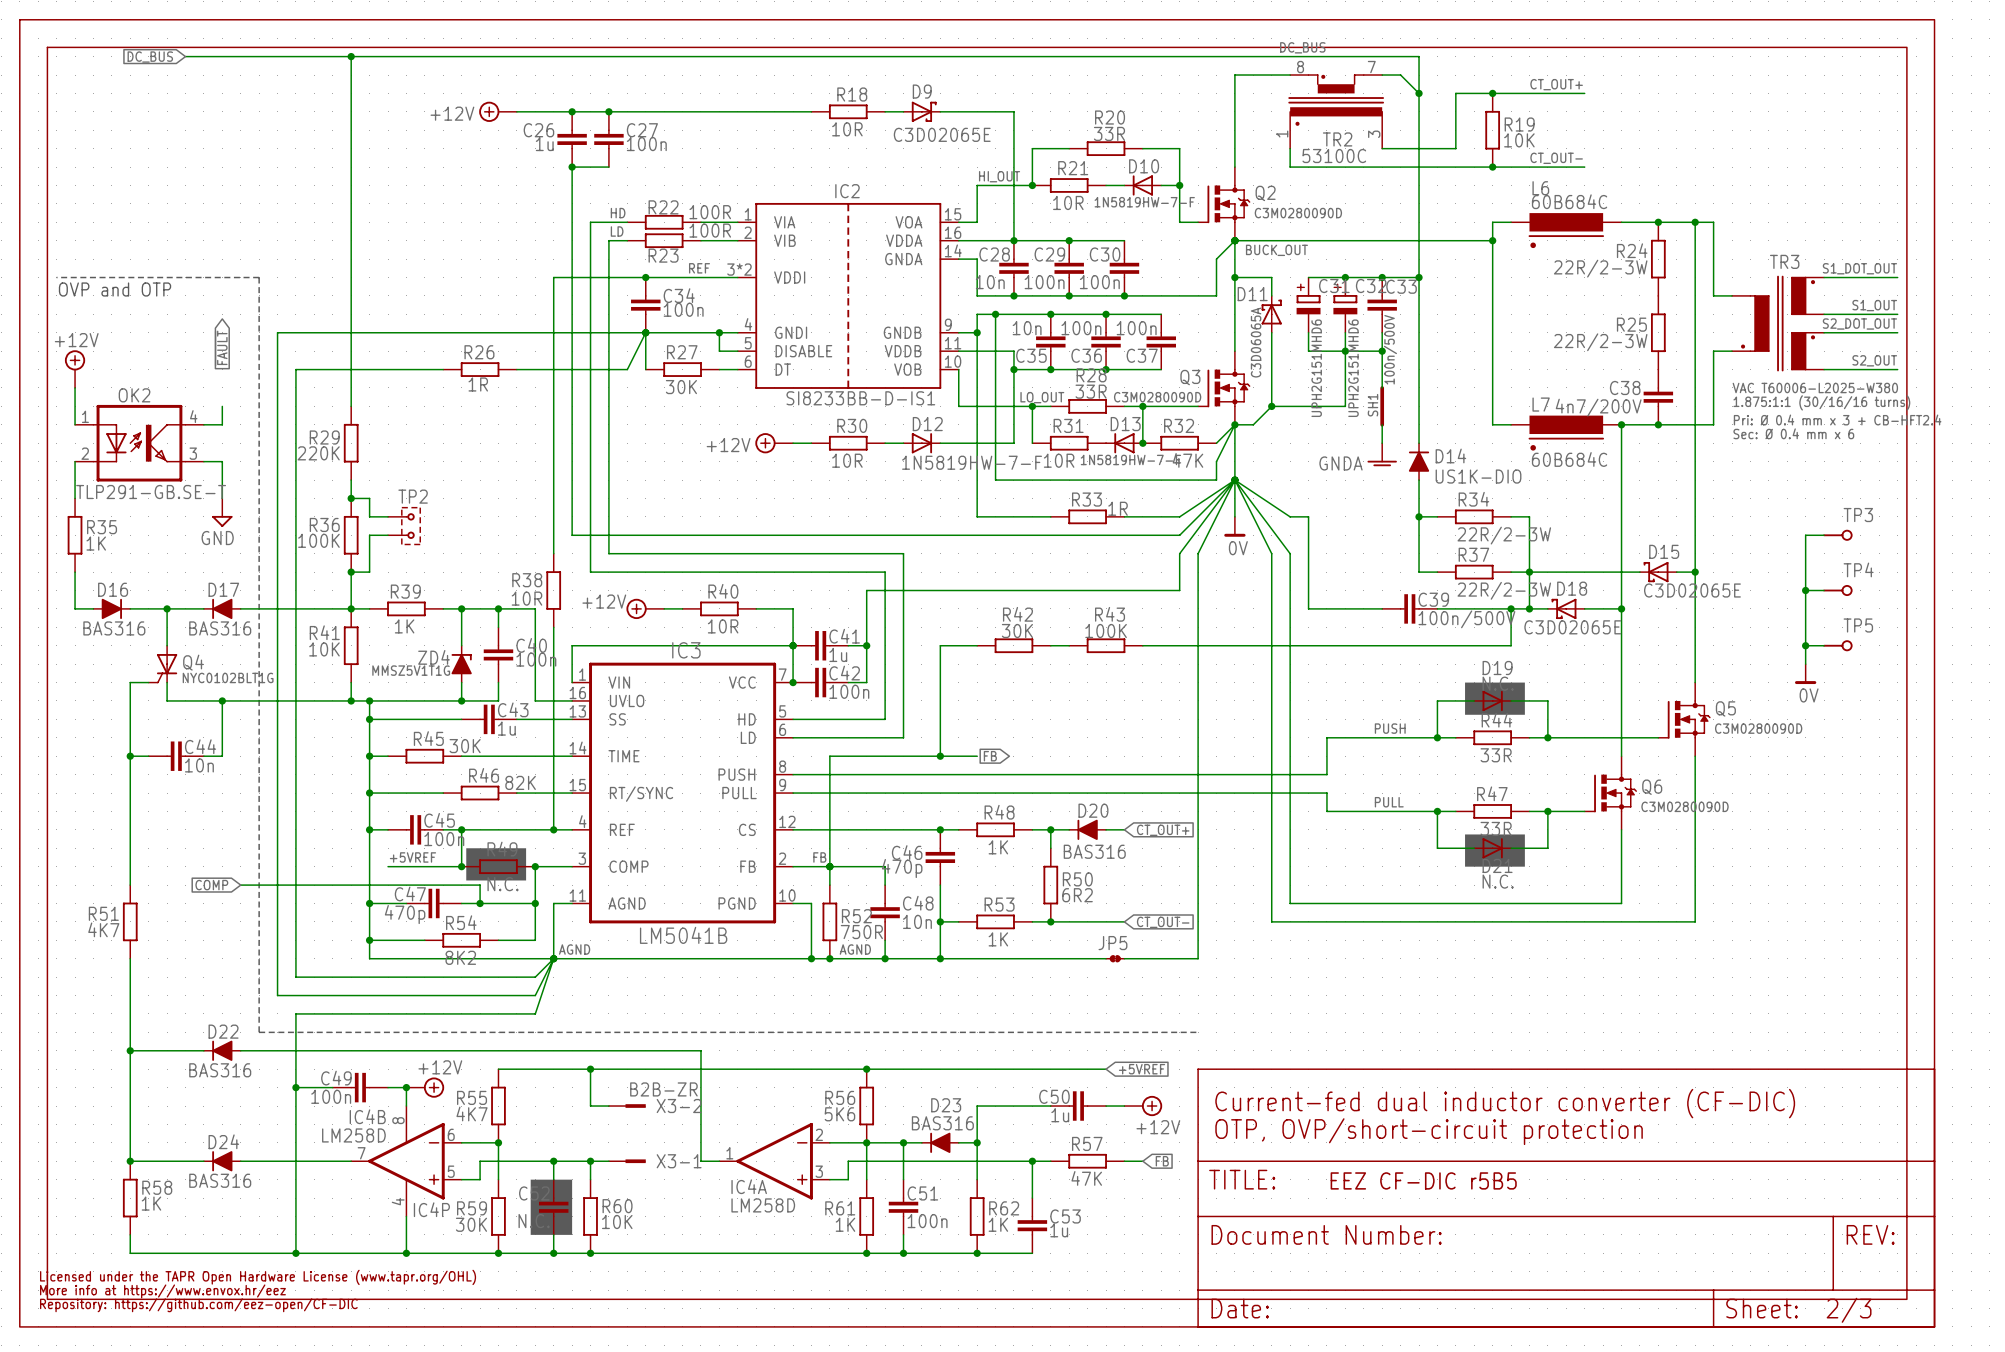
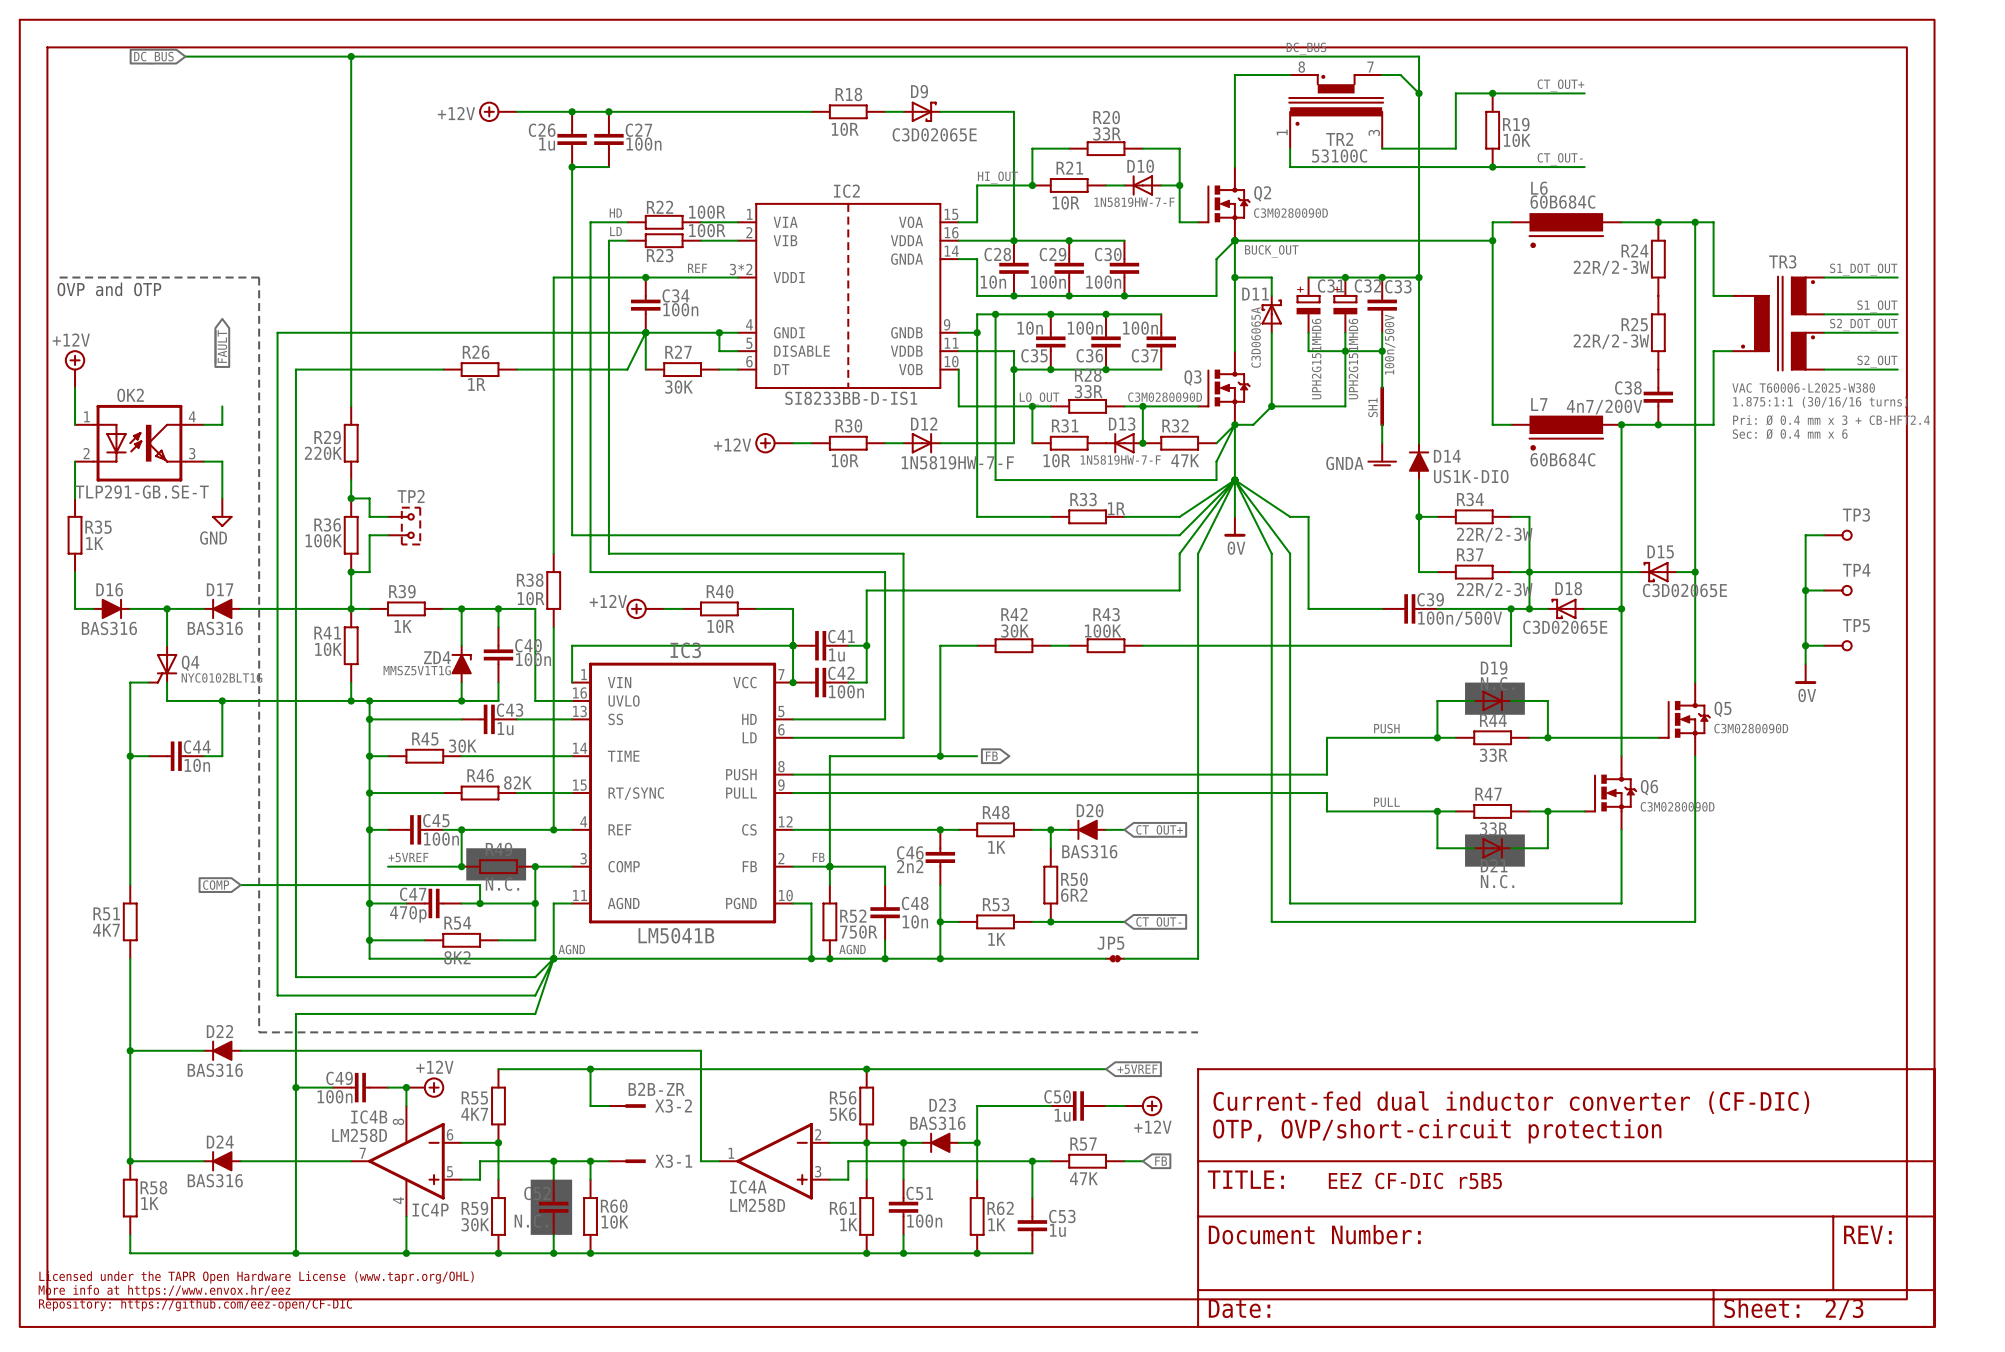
C46 value: 470p (902, 868) -> 2n2 (910, 866)

